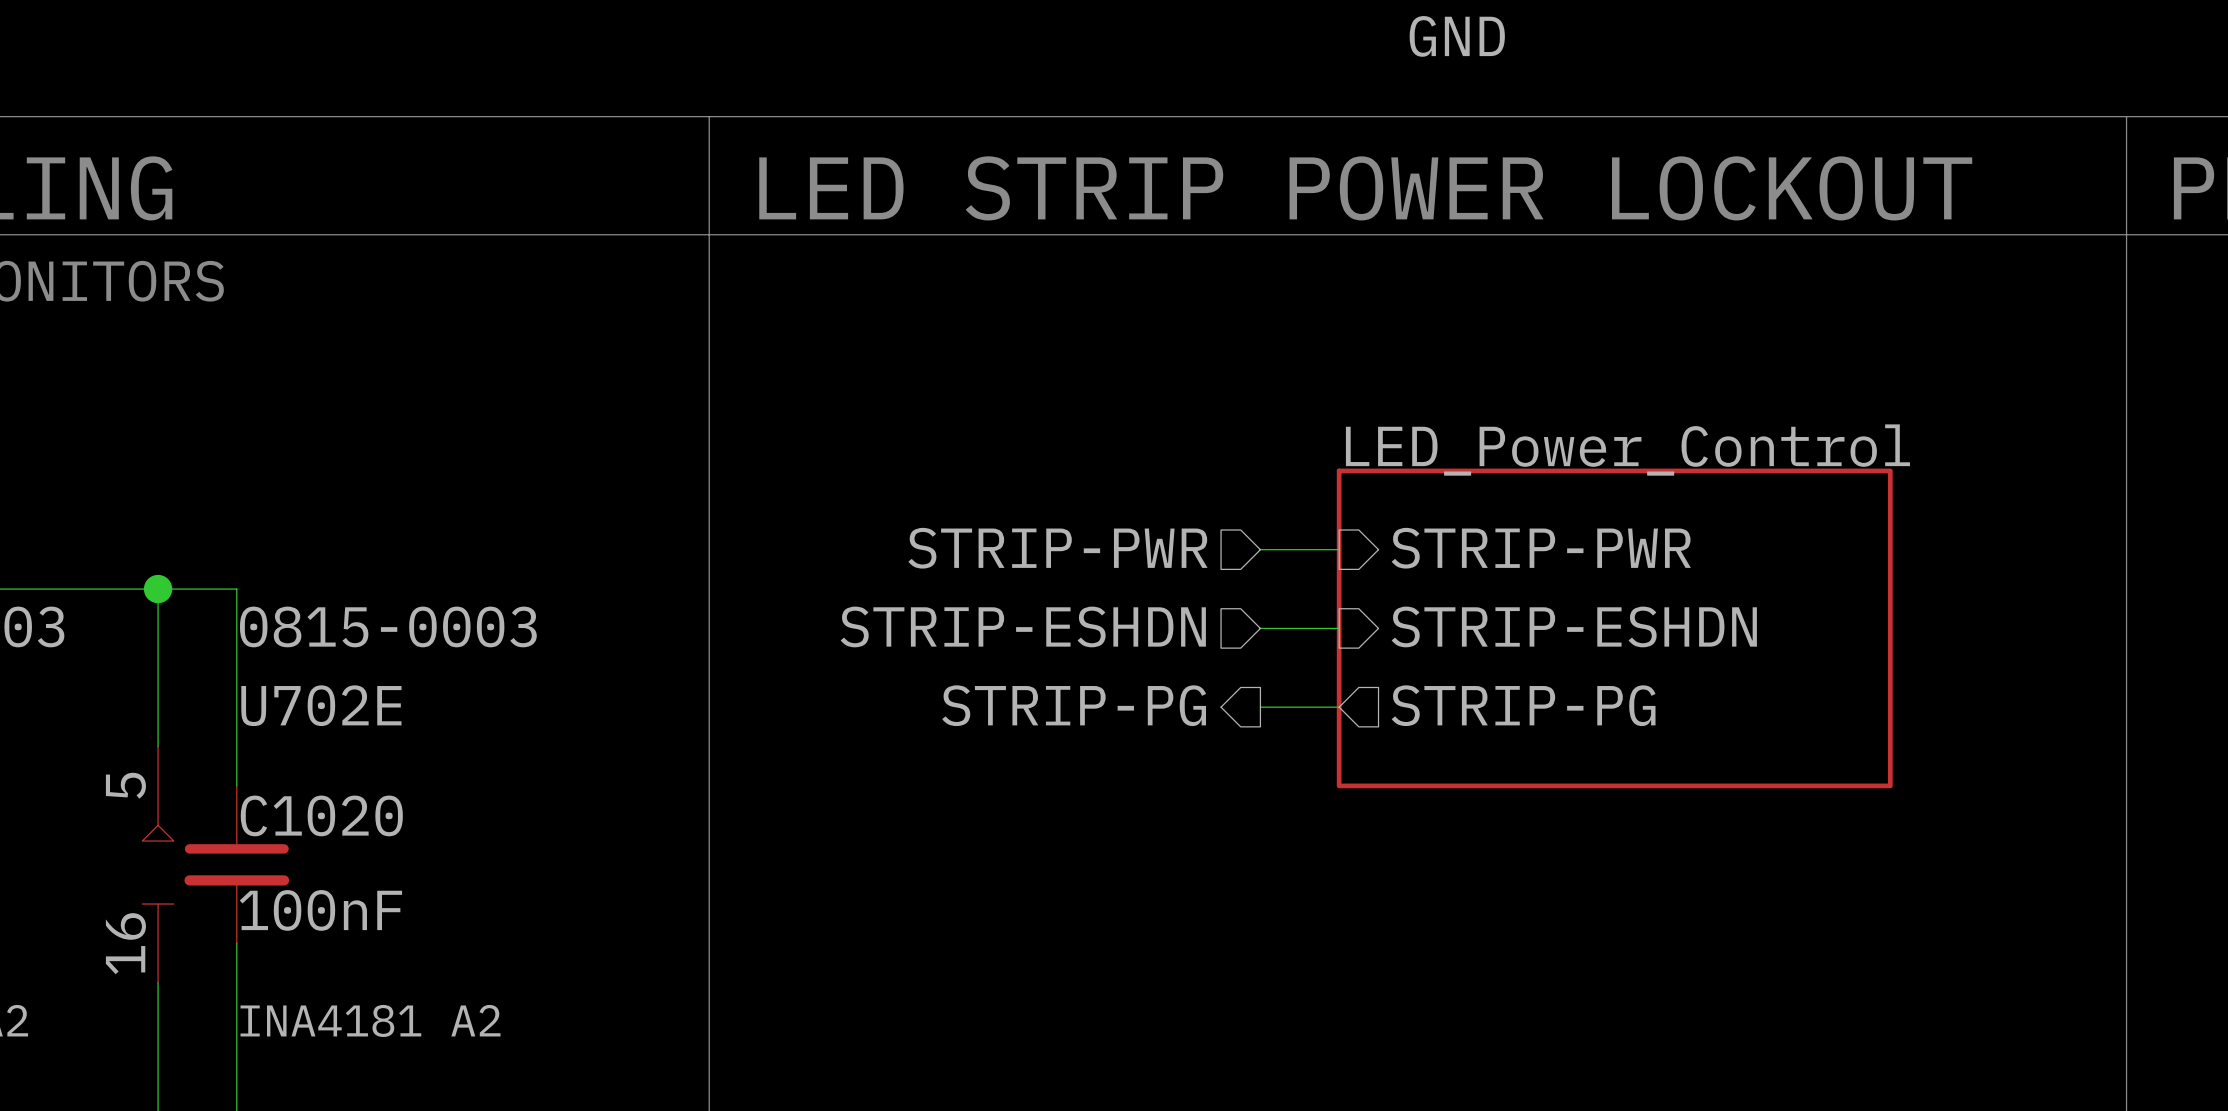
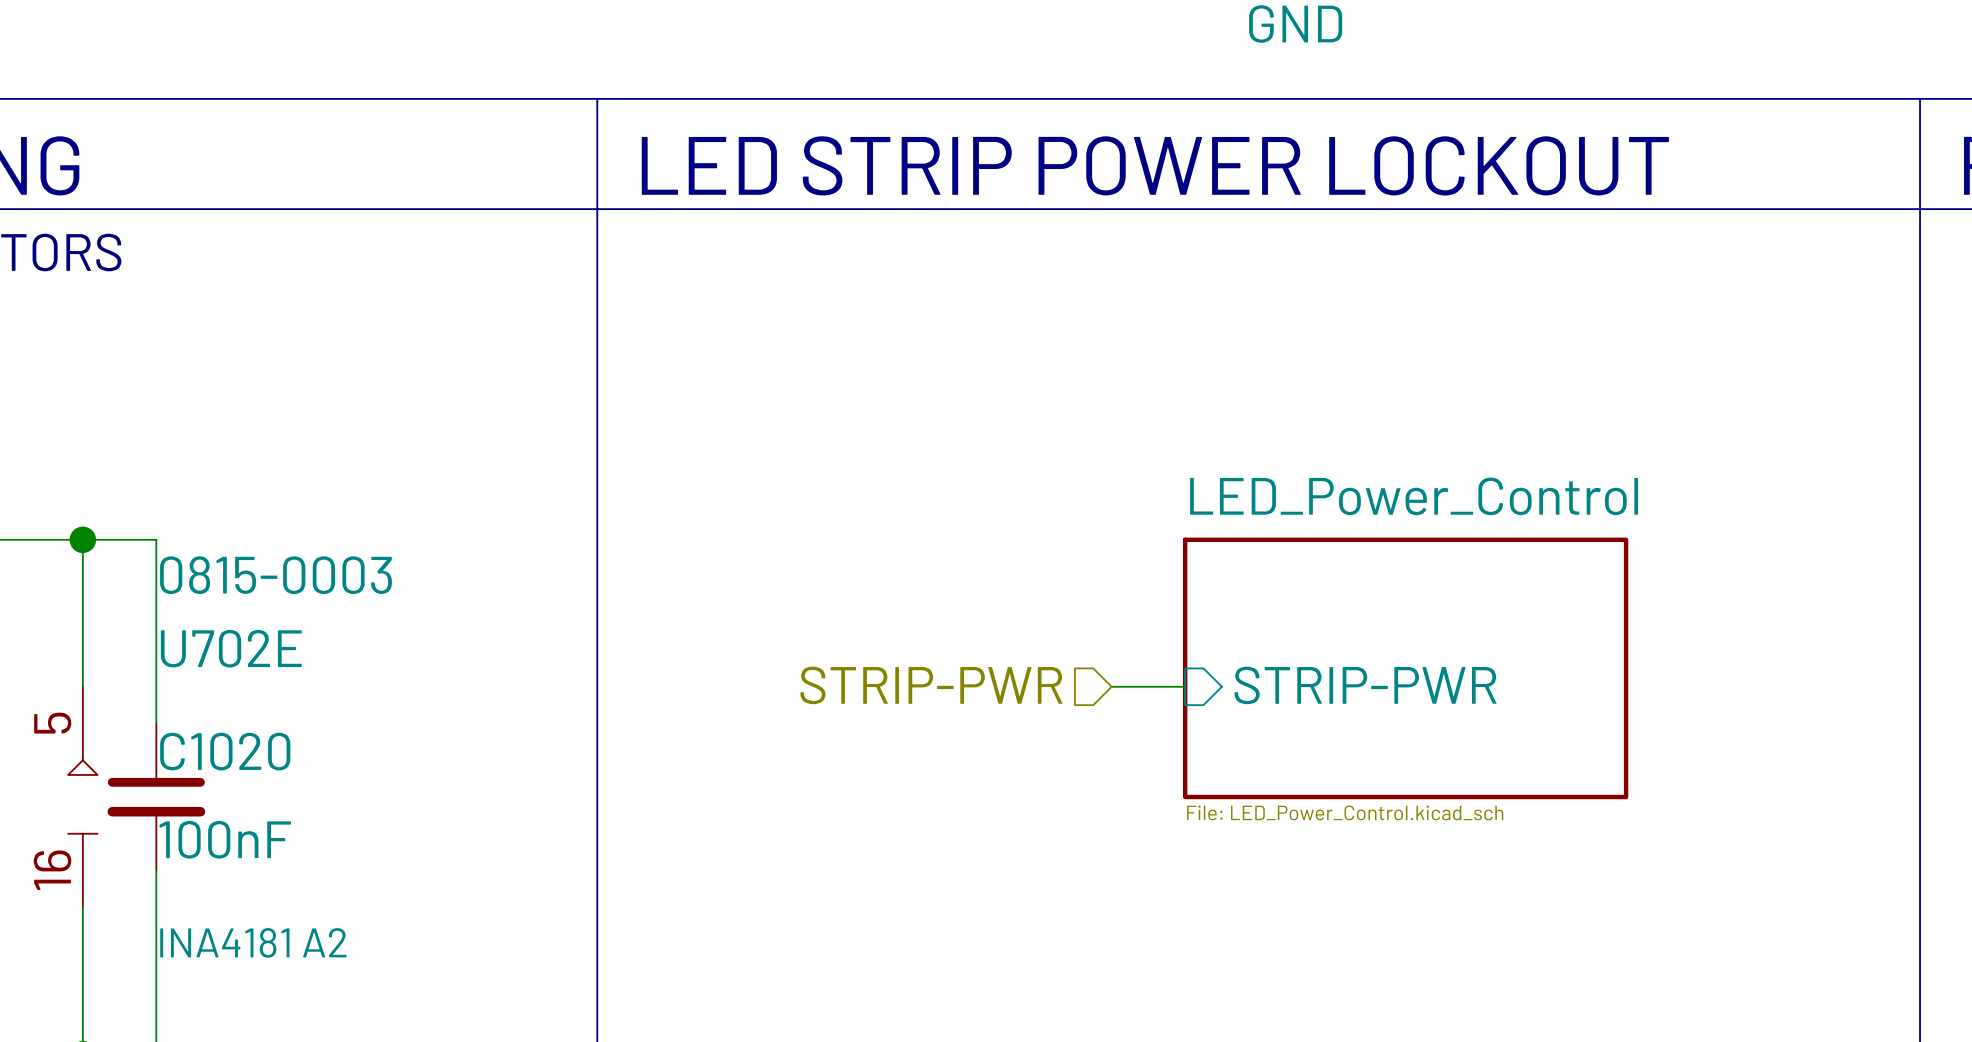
hierarchical label position: STRIP-PWR (1057, 548) -> STRIP-PWR (931, 685)
sheet pin position: STRIP-PWR (1541, 548) -> STRIP-PWR (1365, 685)
wire: (1260, 549) (1339, 549) -> none
hierarchical label: STRIP-ESHDN (1023, 626) -> none
sheet pin: STRIP-ESHDN (1574, 626) -> none
wire: (1260, 628) (1339, 628) -> none
sheet LED_Power_Control: (1614, 628) -> none
hierarchical label: STRIP-PG (1074, 705) -> none
sheet pin: STRIP-PG (1523, 705) -> none
wire: (1260, 707) (1339, 707) -> (1111, 686) (1185, 686)
sheet LED_Power_Control: none -> File: LED_Power_Control.kicad_sch (1405, 668)

